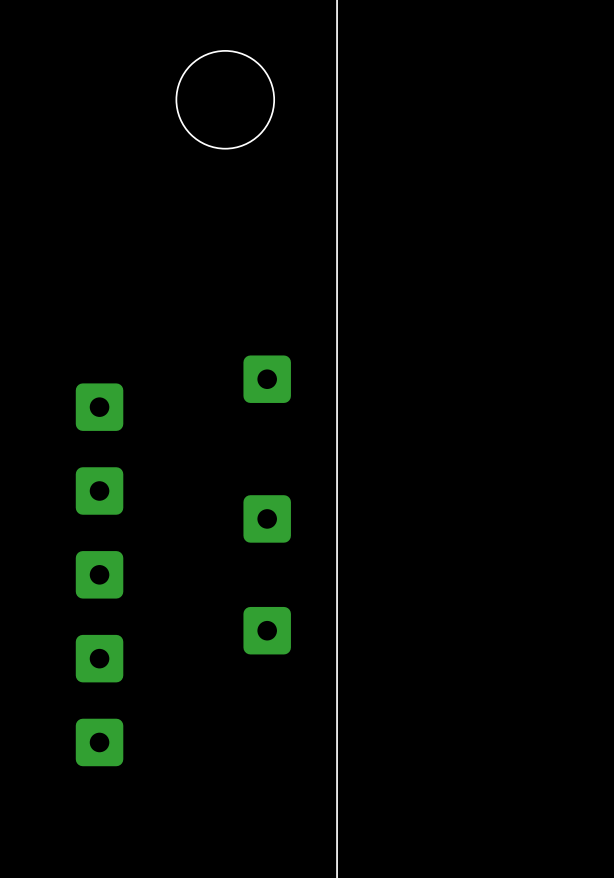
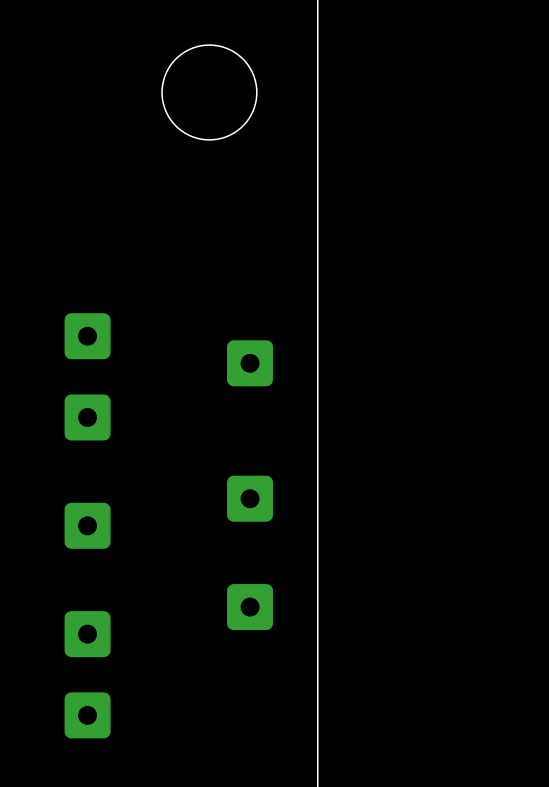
part: none -> (87, 336)
part: (99, 407) -> none
part: none -> (87, 417)
part: (99, 490) -> none
part: none -> (87, 525)
part: (99, 574) -> none

